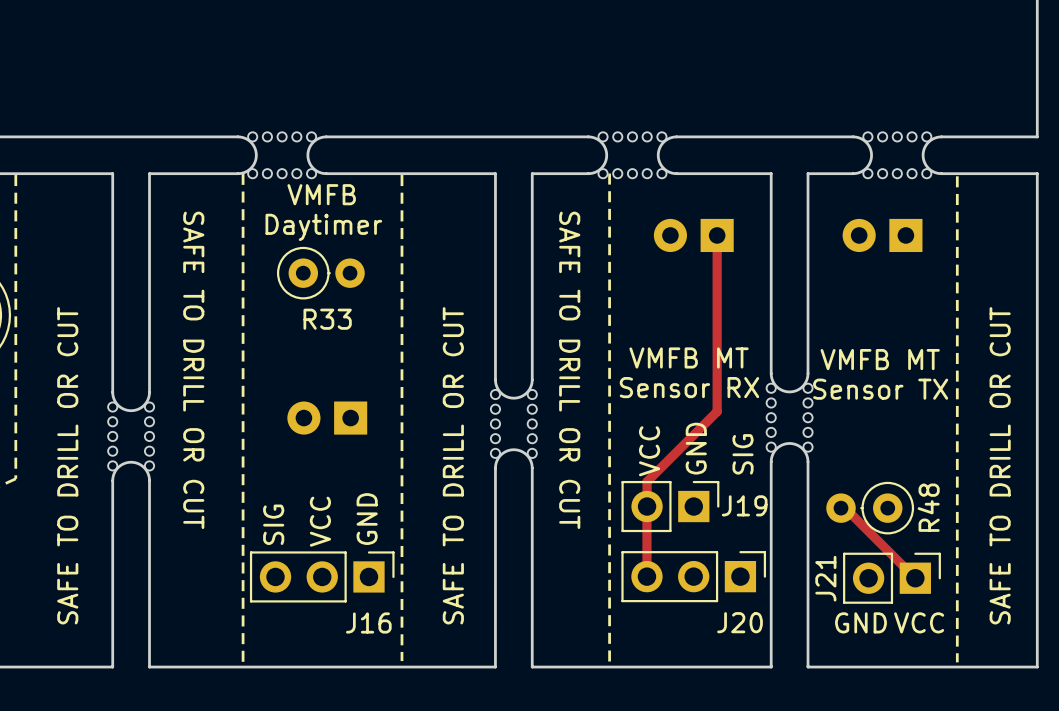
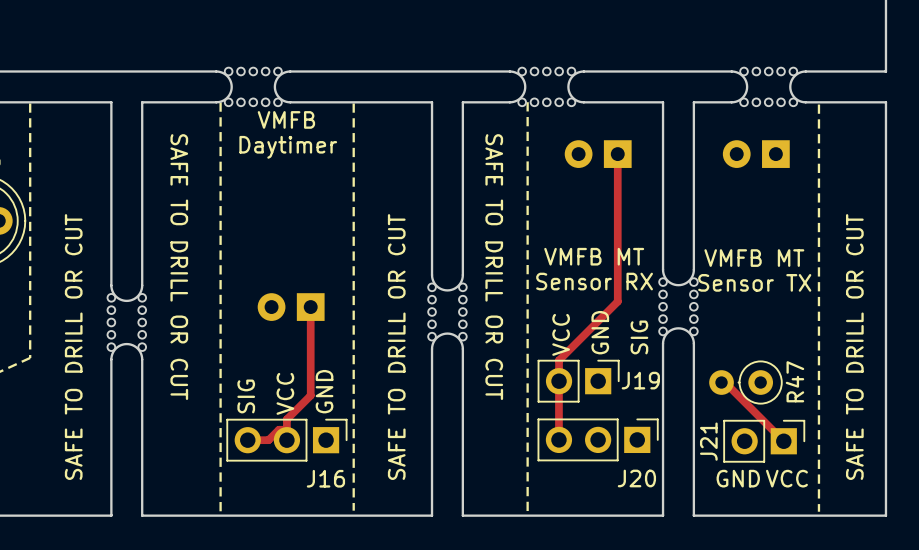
R33: (320, 273) -> none
track: none -> (310, 307) (310, 395) (286, 419) (286, 440)
R48 name: R48 (928, 507) -> R47 (794, 381)
track: none -> (286, 429) (278, 429) (268, 440) (247, 440)

